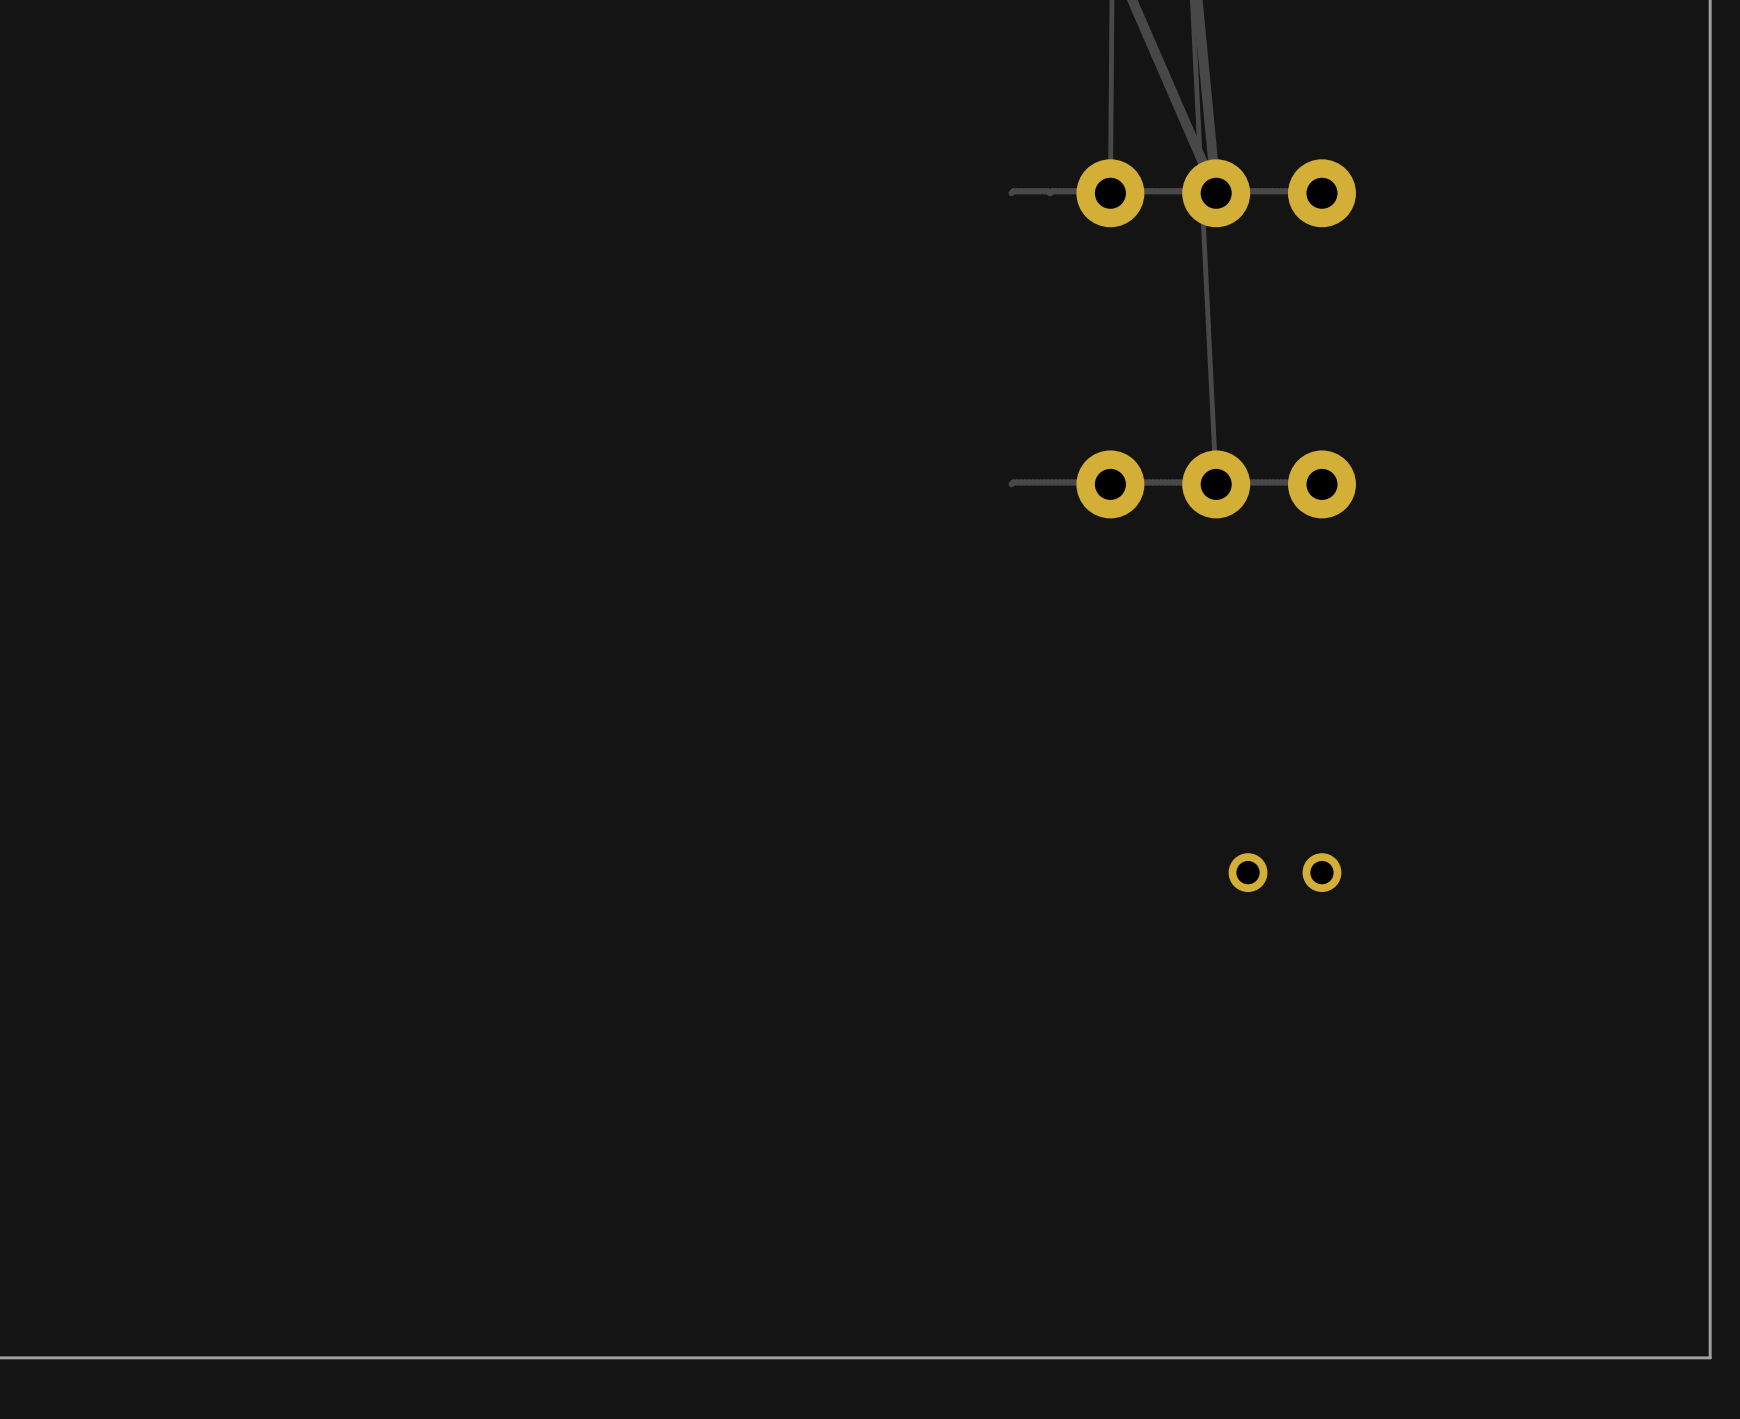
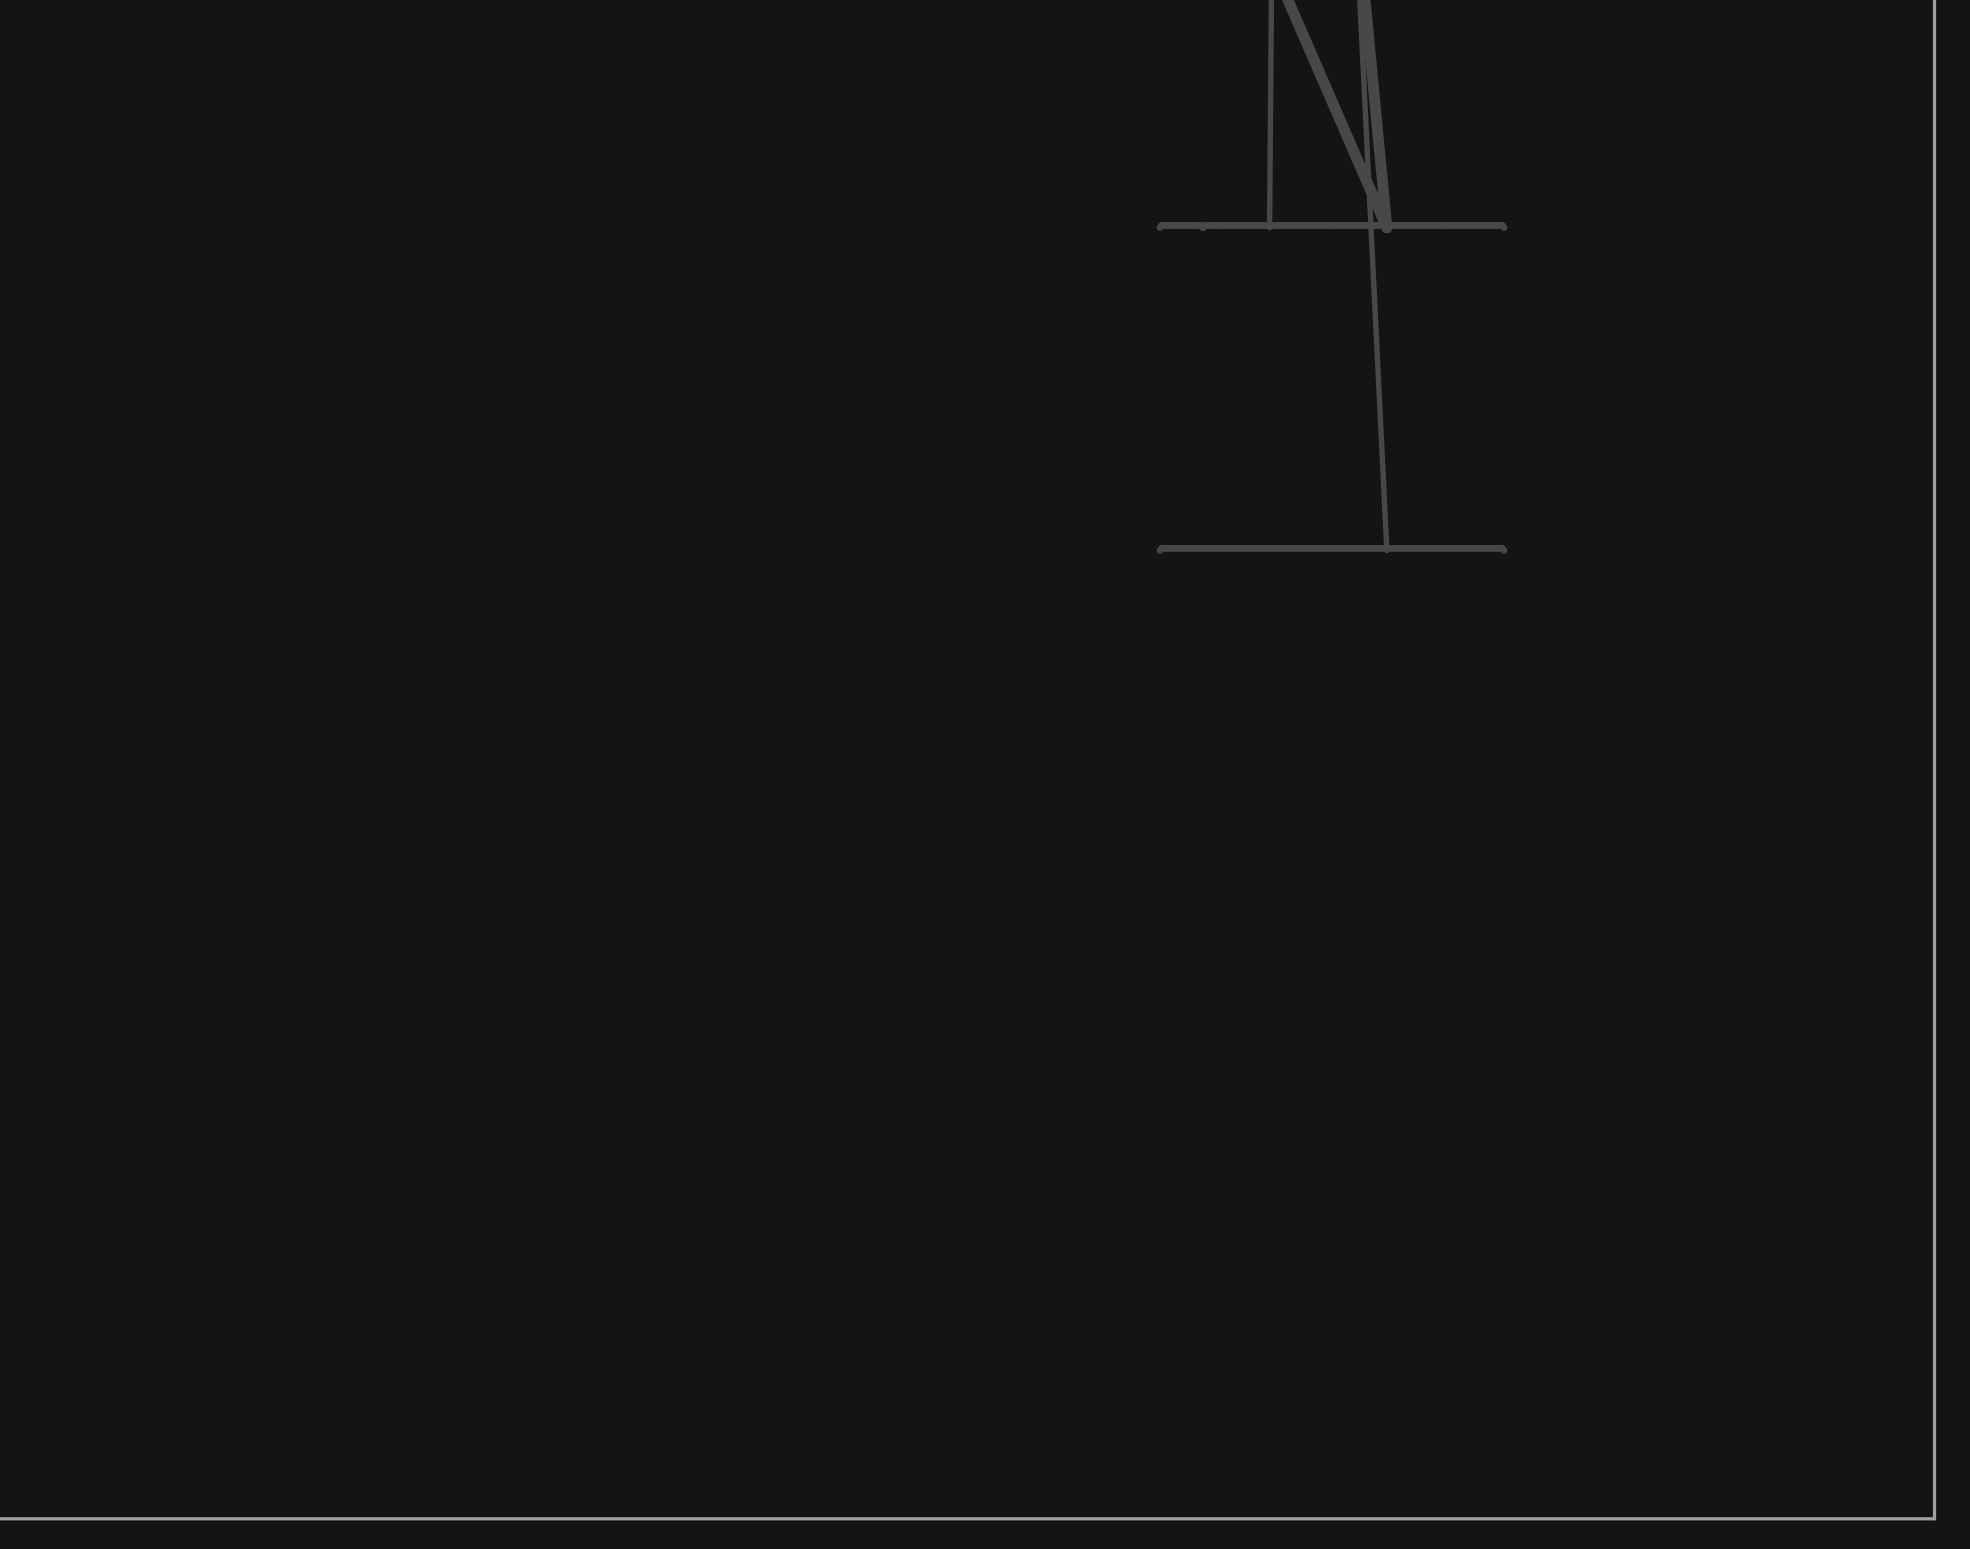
part: (1216, 193) -> none
part: (1216, 484) -> none
part: (1285, 872) -> none

